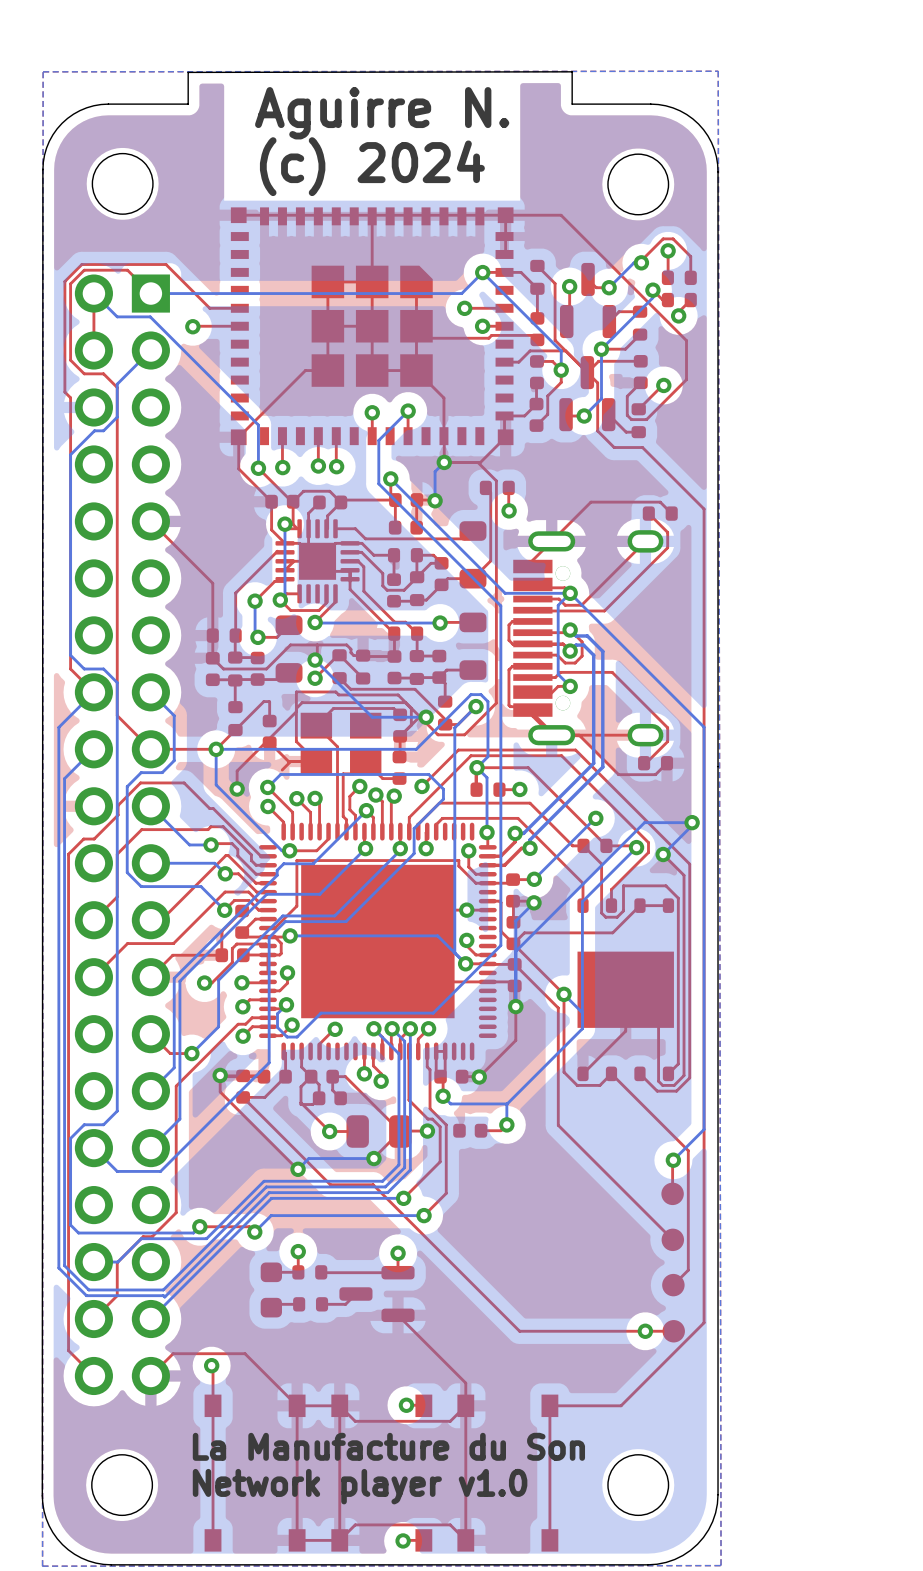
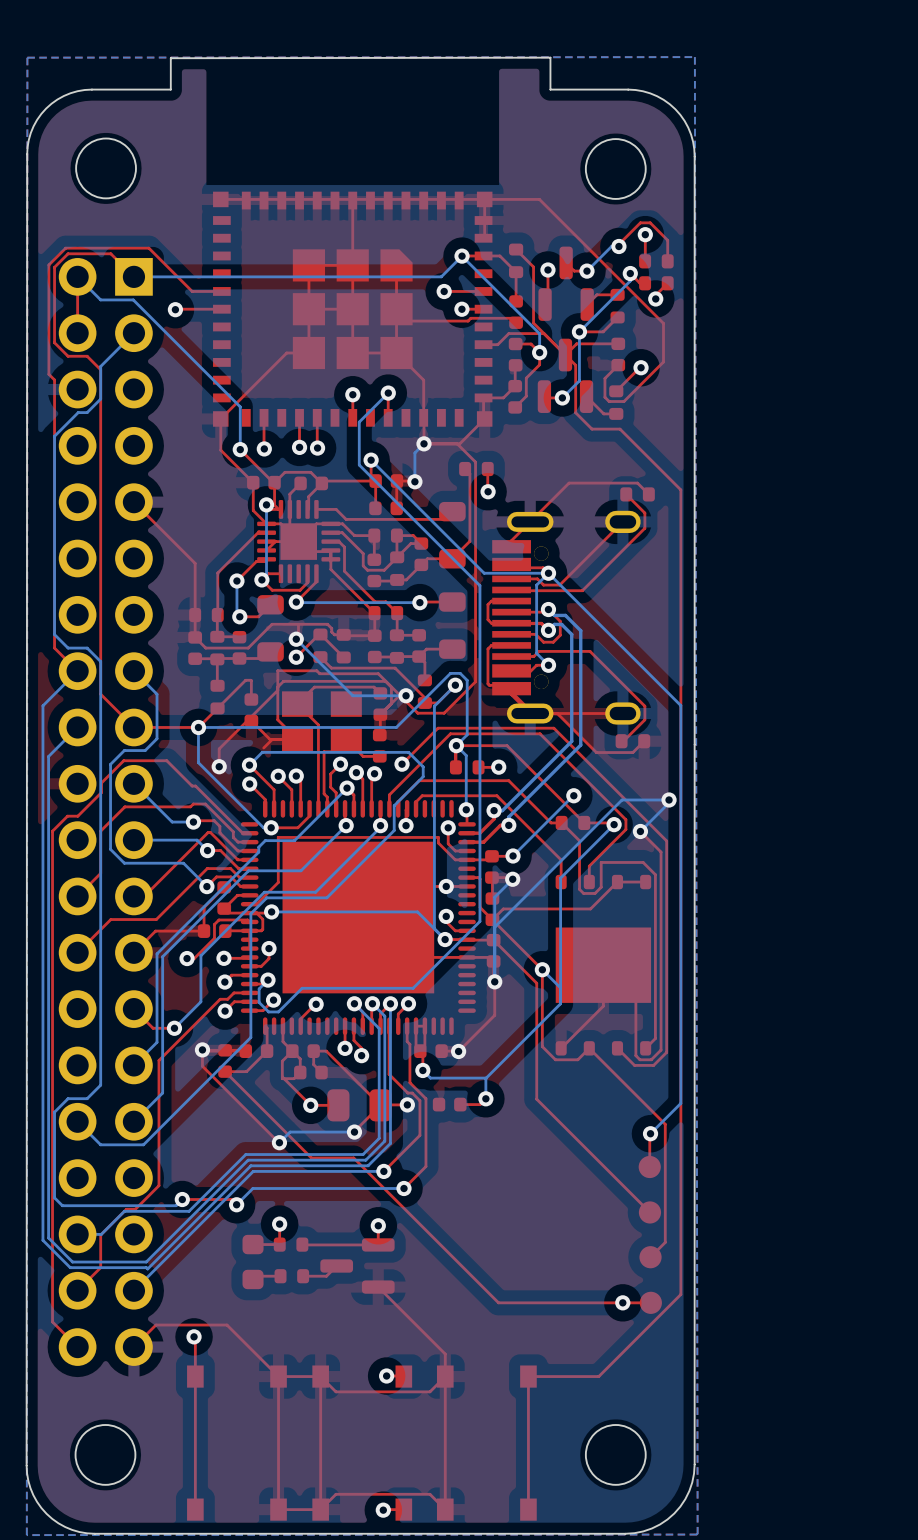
text: Aguirre N. (382, 113) -> none
text: (c) 2024 (372, 166) -> none
text: La Manufacture du Son (388, 1446) -> none
text: Network player v1.0 (360, 1486) -> none

